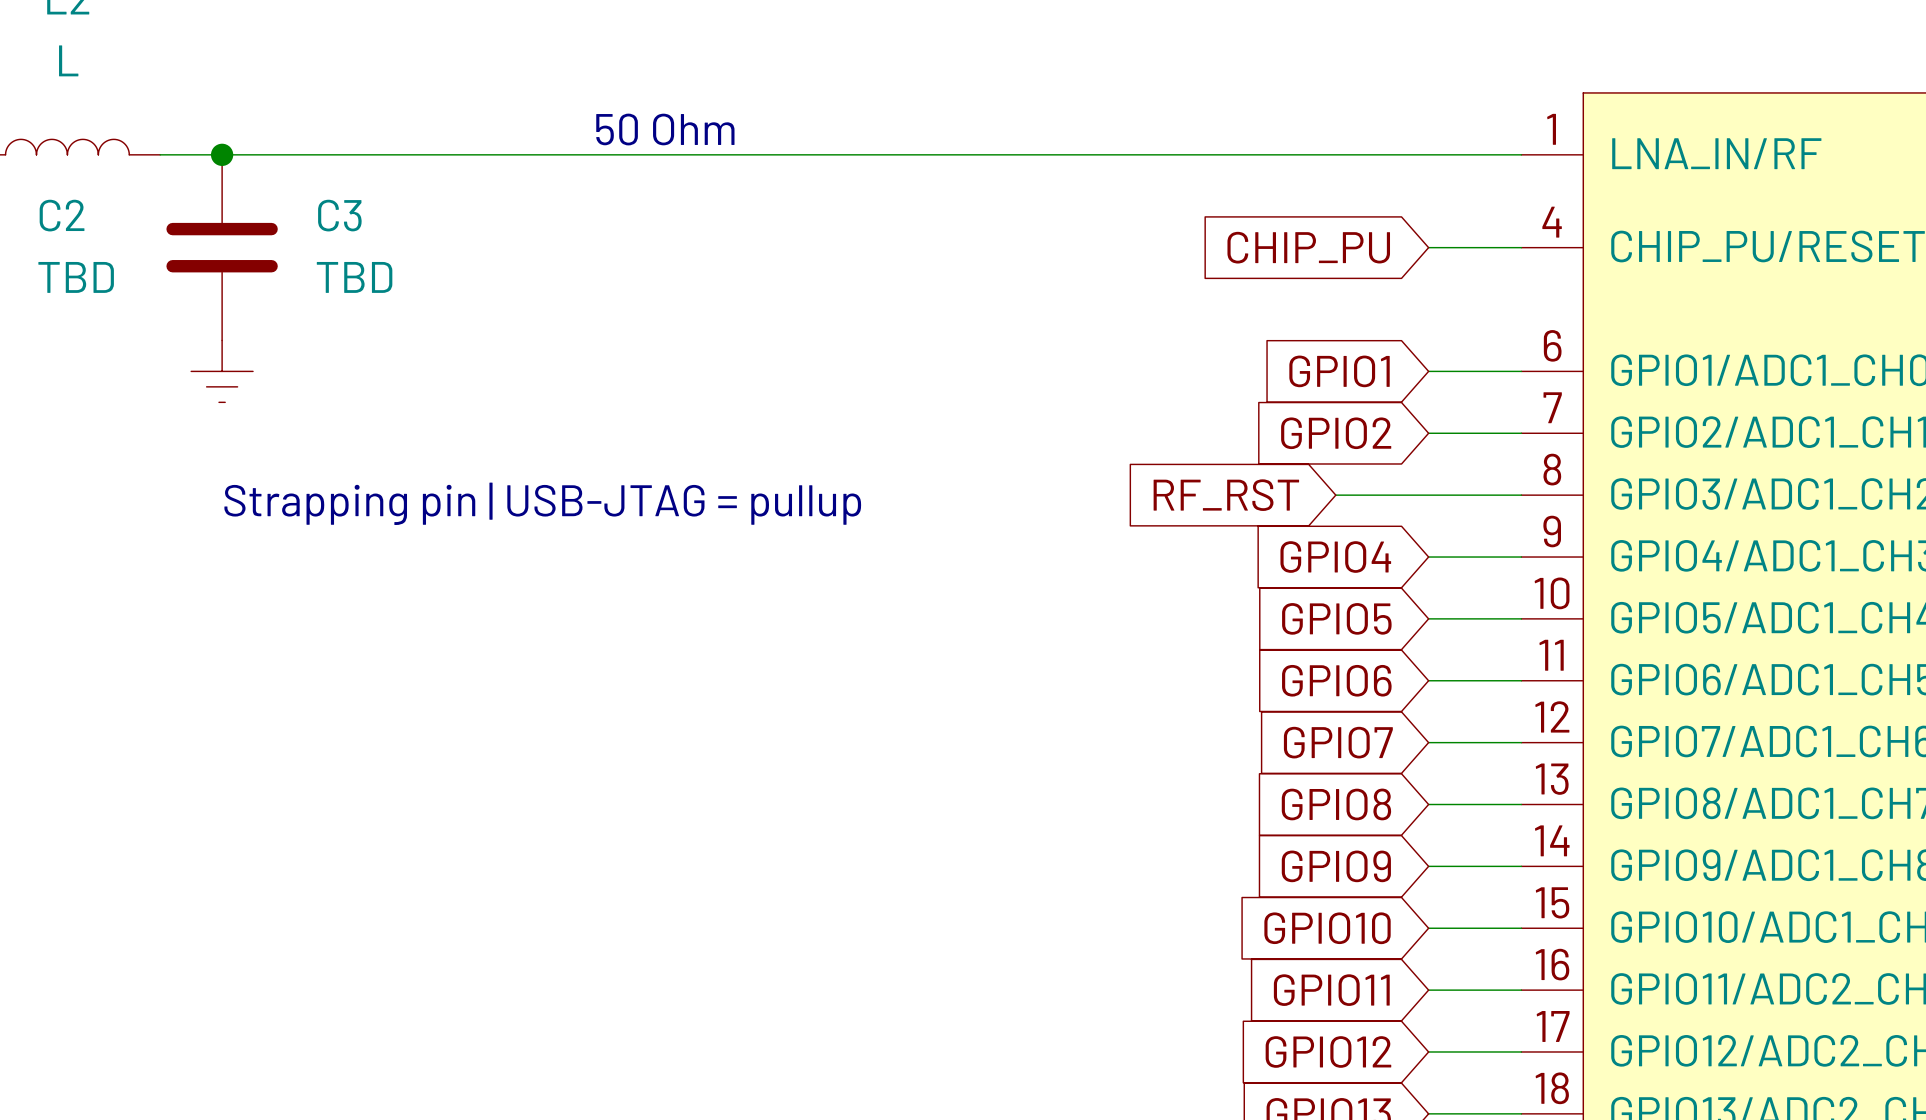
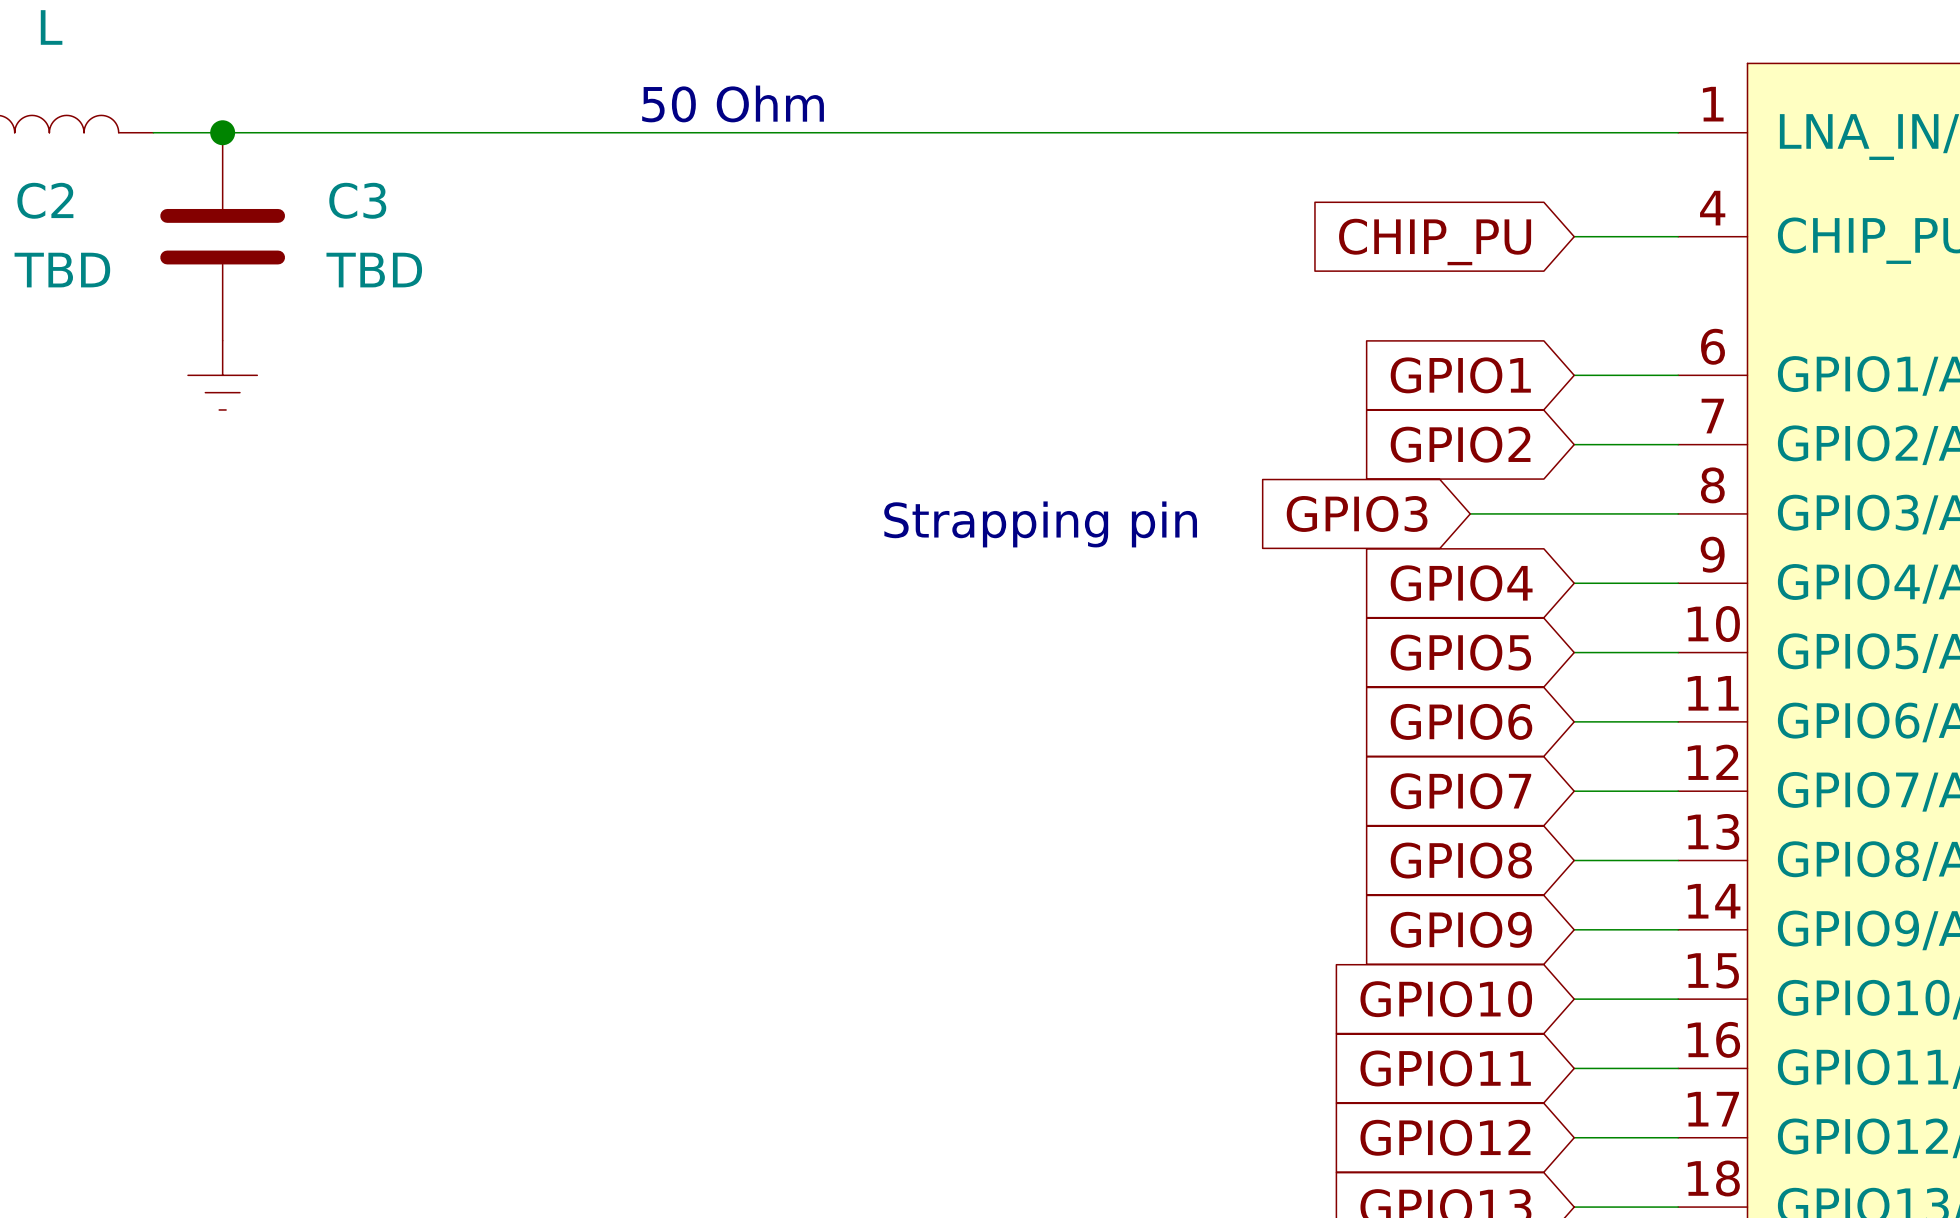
global label: RF_RST (1226, 495) -> GPIO3 (1357, 513)
text: Strapping pin | USB-JTAG = pullup (542, 503) -> none
text: none -> Strapping pin (1040, 524)

